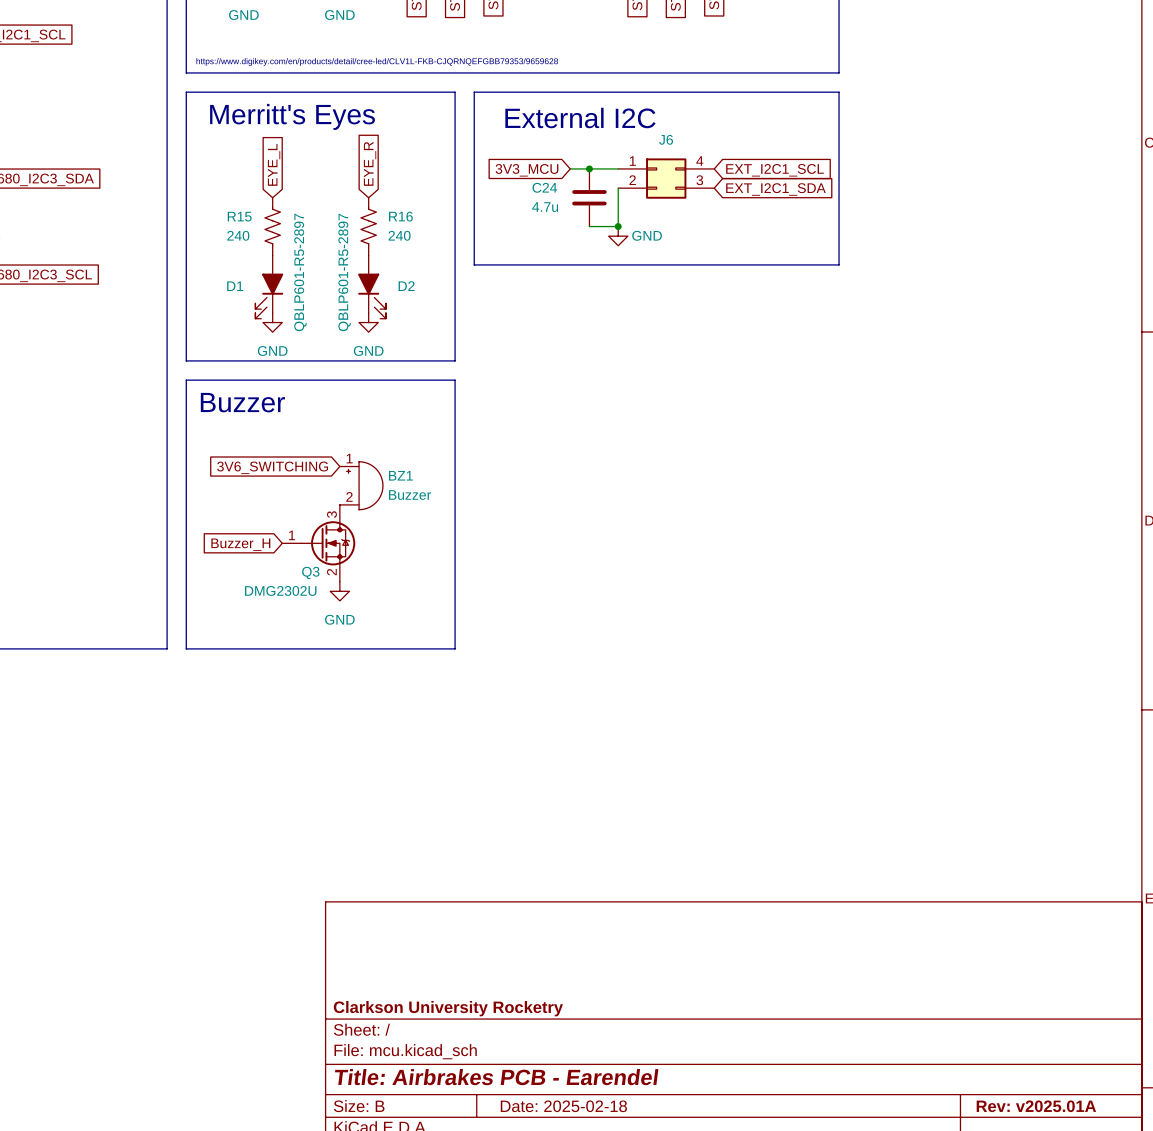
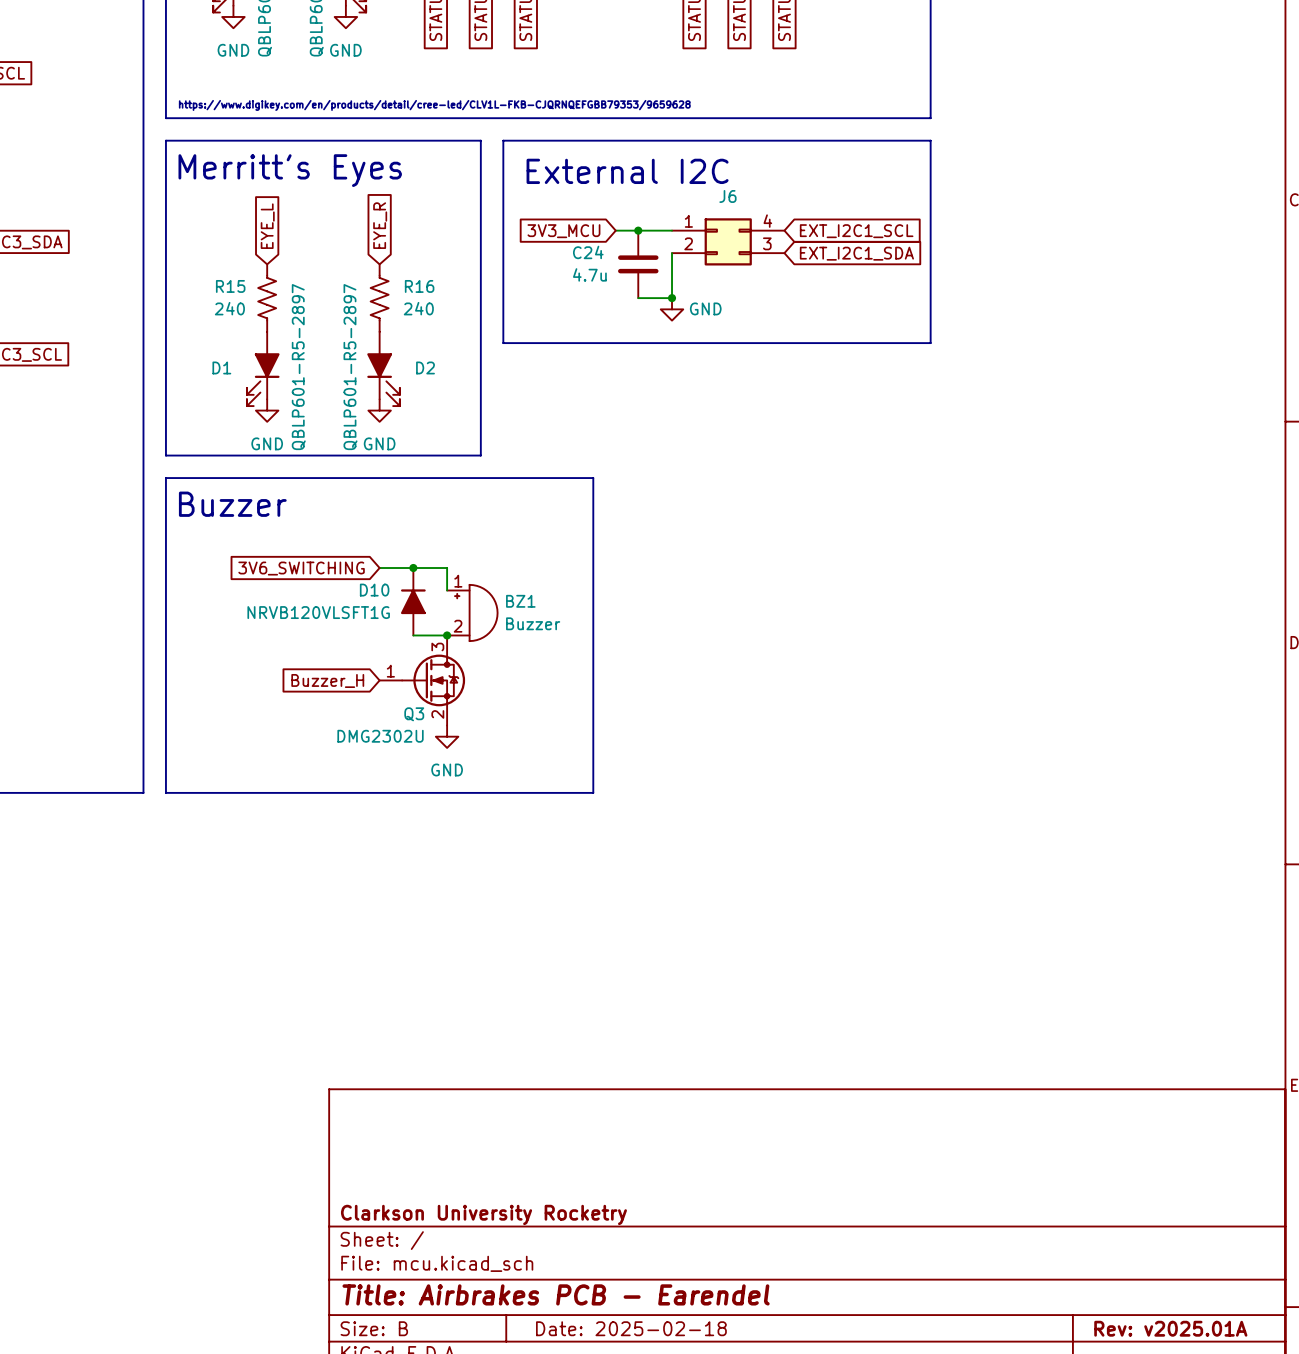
line: (455, 380) (455, 648) -> (480, 478) (593, 478) (593, 792) (480, 792)
wire: none -> (379, 568) (447, 568) (447, 590)
junction: none -> (413, 568)
global label position: 3V6_SWITCHING (272, 467) -> 3V6_SWITCHING (301, 568)
BZ1 position: (361, 485) -> (472, 612)
D10: none -> NRVB120VLSFT1G (413, 601)
wire: none -> (413, 635) (447, 635)
junction: none -> (447, 635)
Q3 position: (318, 543) -> (422, 680)
global label position: Buzzer_H (240, 544) -> Buzzer_H (327, 680)
power symbol position: GND (339, 591) -> GND (447, 736)

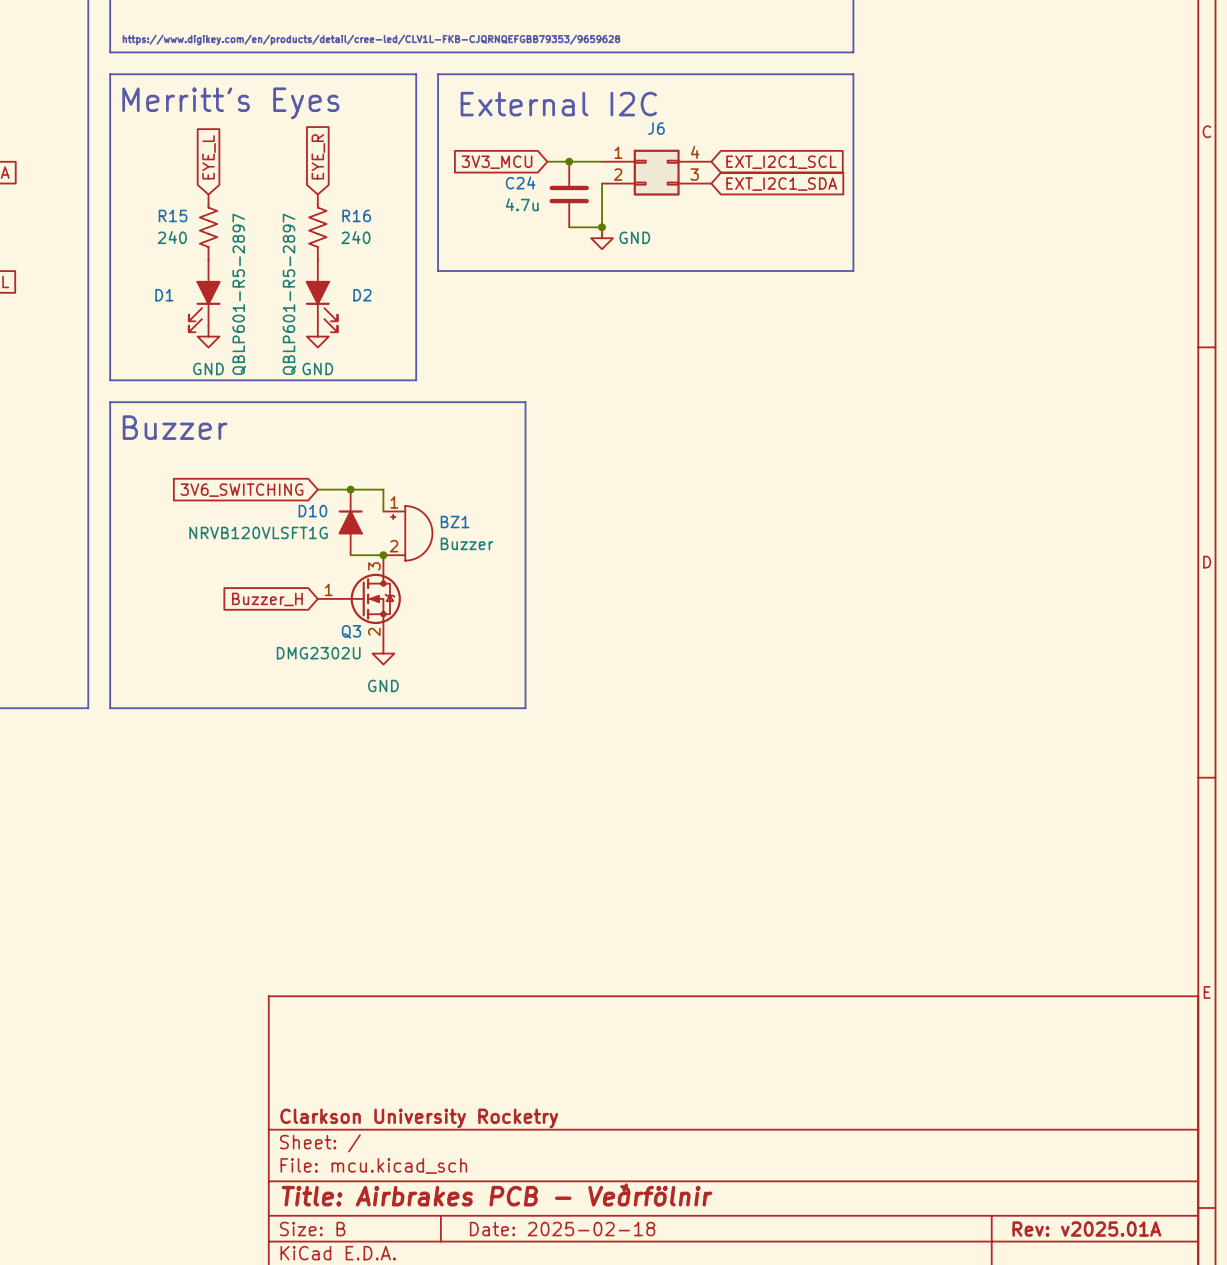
title block: Title: Airbrakes PCB - Earendel (556, 1294) -> Title: Airbrakes PCB - Veðrfölnir (497, 1194)

